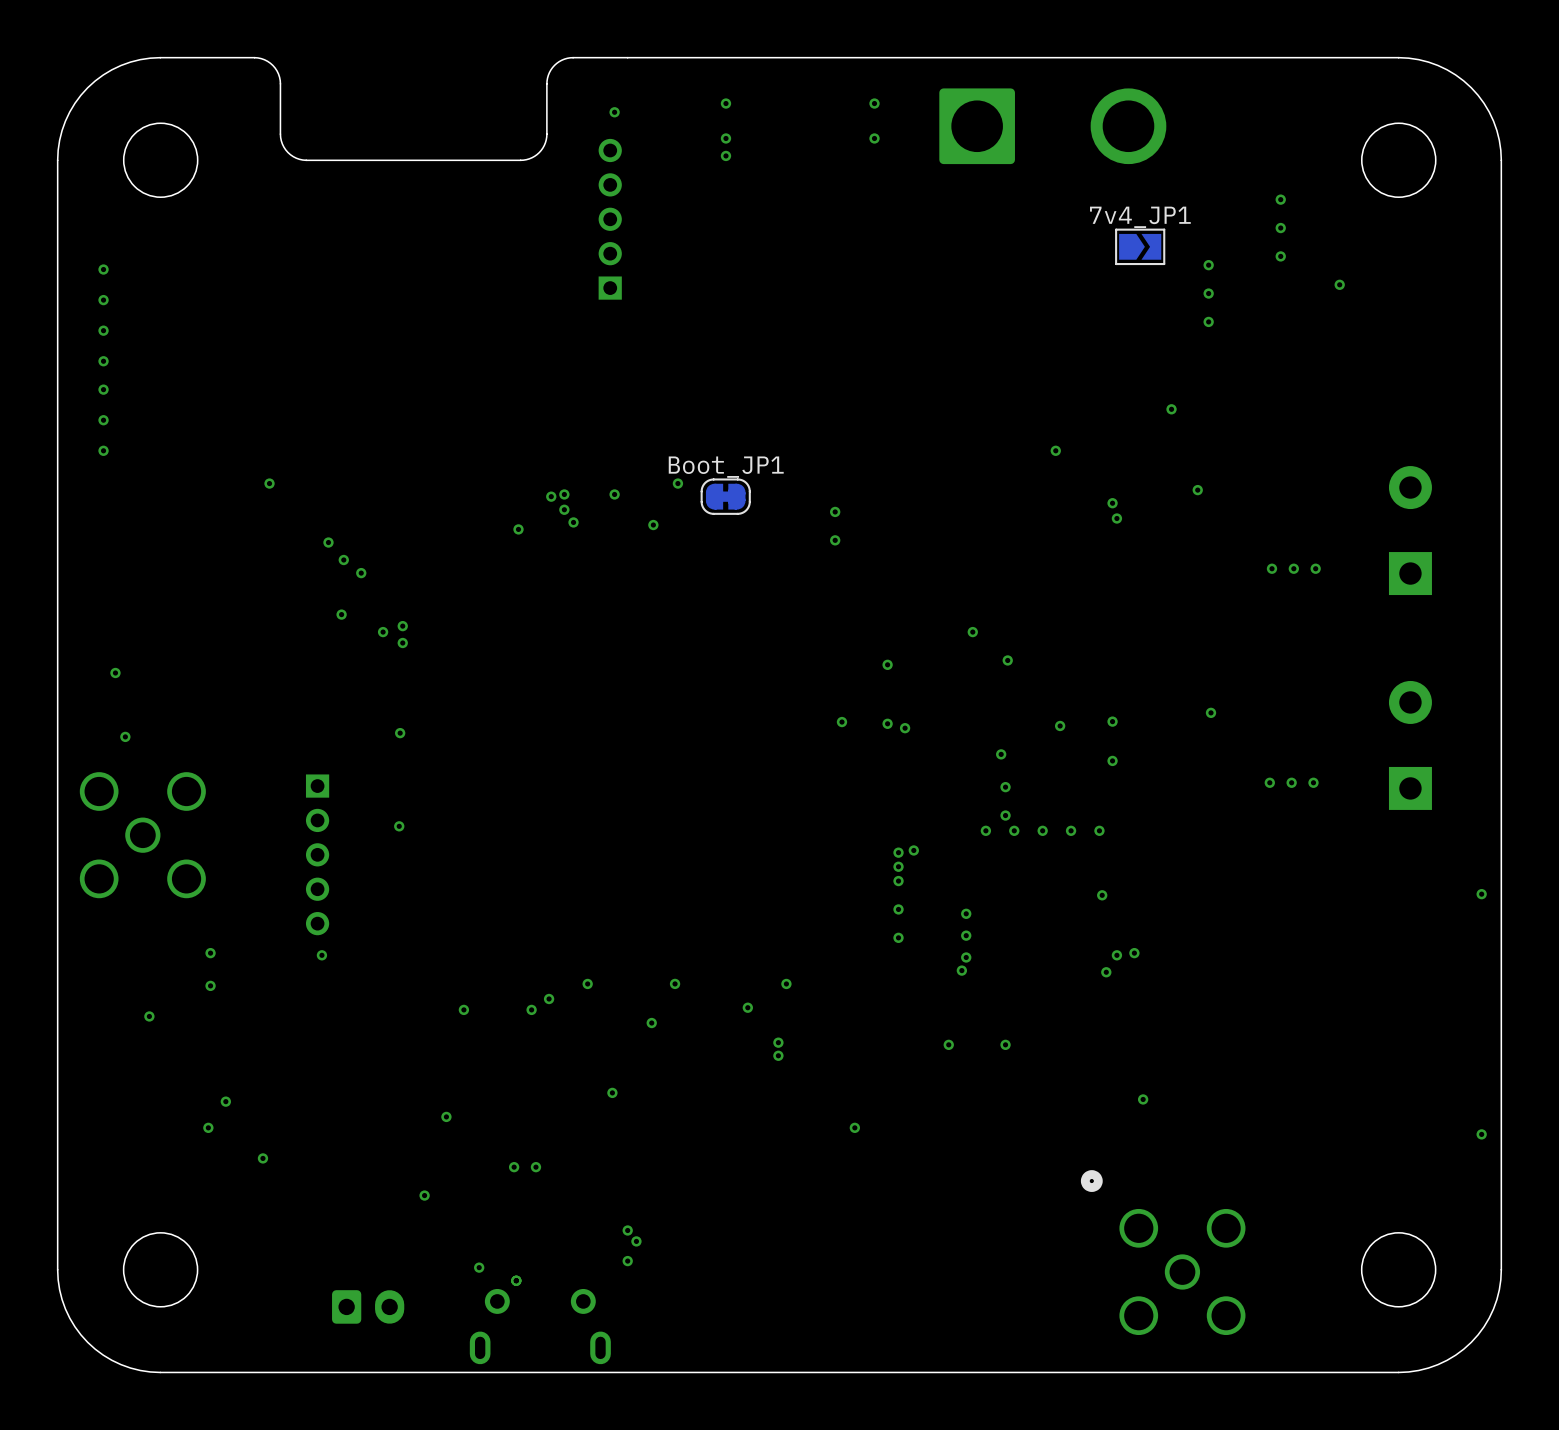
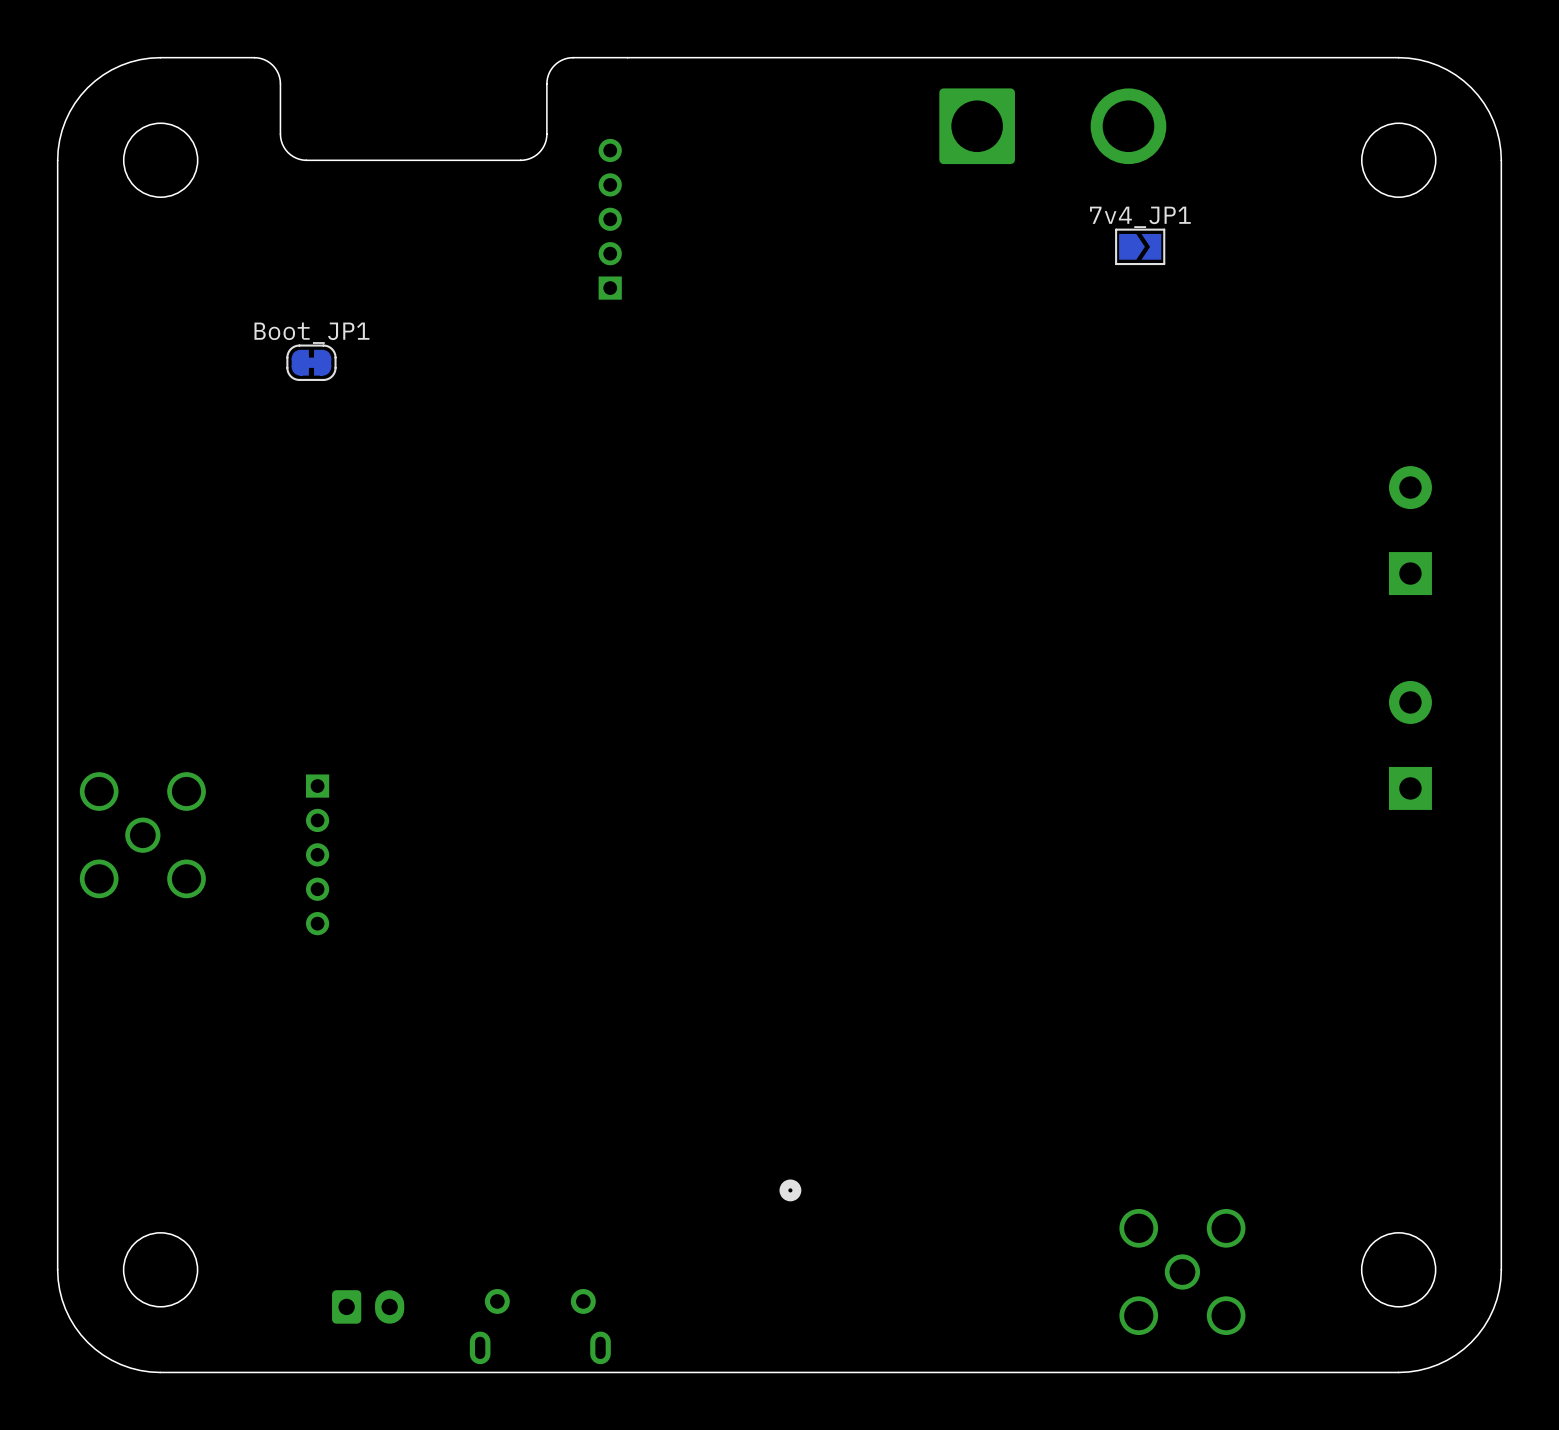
via: (725, 103) -> none
via: (874, 103) -> none
via: (614, 112) -> none
via: (725, 138) -> none
via: (874, 138) -> none
via: (725, 155) -> none
via: (1280, 199) -> none
via: (1280, 228) -> none
via: (1280, 256) -> none
via: (1208, 265) -> none
via: (103, 269) -> none
via: (1339, 284) -> none
via: (1208, 293) -> none
via: (103, 300) -> none
via: (1208, 321) -> none
via: (103, 330) -> none
via: (103, 361) -> none
via: (103, 389) -> none
via: (1171, 409) -> none
via: (103, 420) -> none
via: (103, 450) -> none
via: (1055, 450) -> none
via: (269, 483) -> none
via: (677, 483) -> none
via: (1197, 490) -> none
via: (564, 494) -> none
via: (614, 494) -> none
via: (551, 496) -> none
Boot_JP1 position: (725, 496) -> (311, 362)
via: (1112, 503) -> none
via: (564, 509) -> none
via: (835, 511) -> none
via: (1116, 518) -> none
via: (573, 522) -> none
via: (653, 525) -> none
via: (518, 529) -> none
via: (835, 540) -> none
via: (328, 542) -> none
via: (343, 560) -> none
via: (1271, 568) -> none
via: (1293, 568) -> none
via: (1315, 568) -> none
via: (361, 573) -> none
via: (341, 614) -> none
via: (402, 626) -> none
via: (383, 632) -> none
via: (972, 632) -> none
via: (402, 642) -> none
via: (1007, 660) -> none
via: (887, 664) -> none
via: (115, 672) -> none
via: (1211, 712) -> none
via: (1112, 721) -> none
via: (841, 722) -> none
via: (887, 723) -> none
via: (1060, 725) -> none
via: (905, 728) -> none
via: (400, 733) -> none
via: (125, 736) -> none
via: (1001, 754) -> none
via: (1112, 760) -> none
via: (1269, 782) -> none
via: (1291, 782) -> none
via: (1313, 782) -> none
via: (1005, 787) -> none
via: (1005, 815) -> none
via: (399, 826) -> none
via: (985, 830) -> none
via: (1014, 830) -> none
via: (1042, 830) -> none
via: (1071, 830) -> none
via: (1099, 830) -> none
via: (913, 850) -> none
via: (898, 852) -> none
via: (898, 866) -> none
via: (898, 881) -> none
via: (1481, 894) -> none
via: (1102, 895) -> none
via: (898, 909) -> none
via: (966, 913) -> none
via: (966, 935) -> none
via: (898, 937) -> none
via: (210, 953) -> none
via: (1134, 953) -> none
via: (321, 955) -> none
via: (1116, 955) -> none
via: (966, 957) -> none
via: (961, 970) -> none
via: (1106, 972) -> none
via: (587, 983) -> none
via: (675, 983) -> none
via: (786, 983) -> none
via: (210, 985) -> none
via: (549, 998) -> none
via: (747, 1007) -> none
via: (463, 1009) -> none
via: (531, 1009) -> none
via: (149, 1016) -> none
via: (651, 1023) -> none
via: (778, 1042) -> none
via: (948, 1044) -> none
via: (1005, 1044) -> none
via: (778, 1055) -> none
via: (612, 1092) -> none
via: (1143, 1099) -> none
via: (225, 1101) -> none
via: (446, 1116) -> none
via: (208, 1127) -> none
via: (854, 1127) -> none
via: (1481, 1134) -> none
via: (262, 1158) -> none
via: (514, 1167) -> none
via: (535, 1167) -> none
part position: (1091, 1181) -> (790, 1190)
via: (424, 1195) -> none
via: (627, 1230) -> none
via: (636, 1241) -> none
via: (627, 1261) -> none
via: (479, 1267) -> none
via: (516, 1280) -> none

